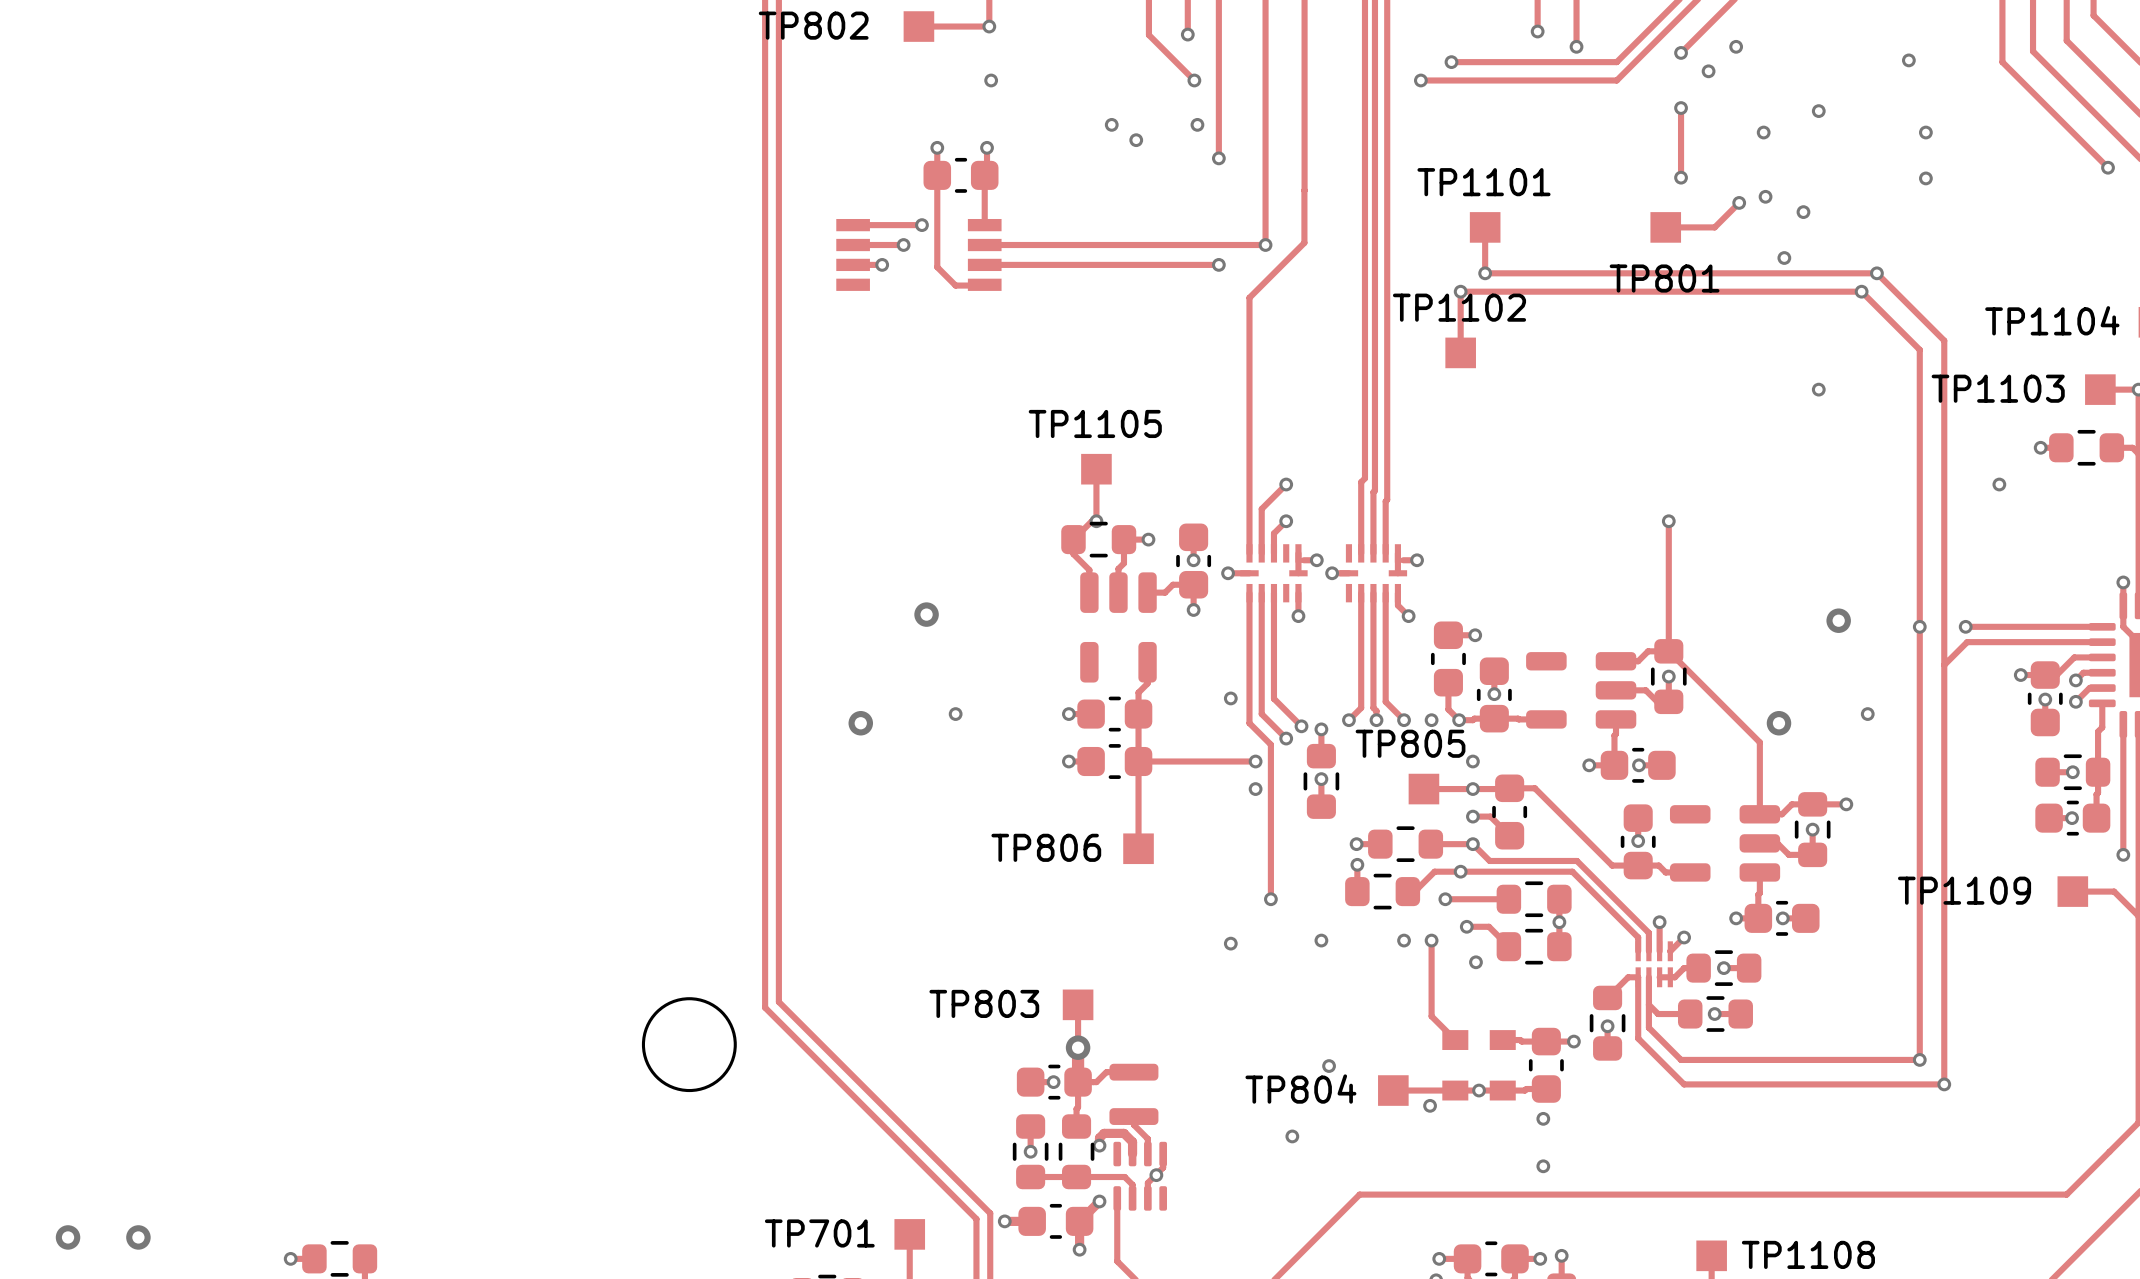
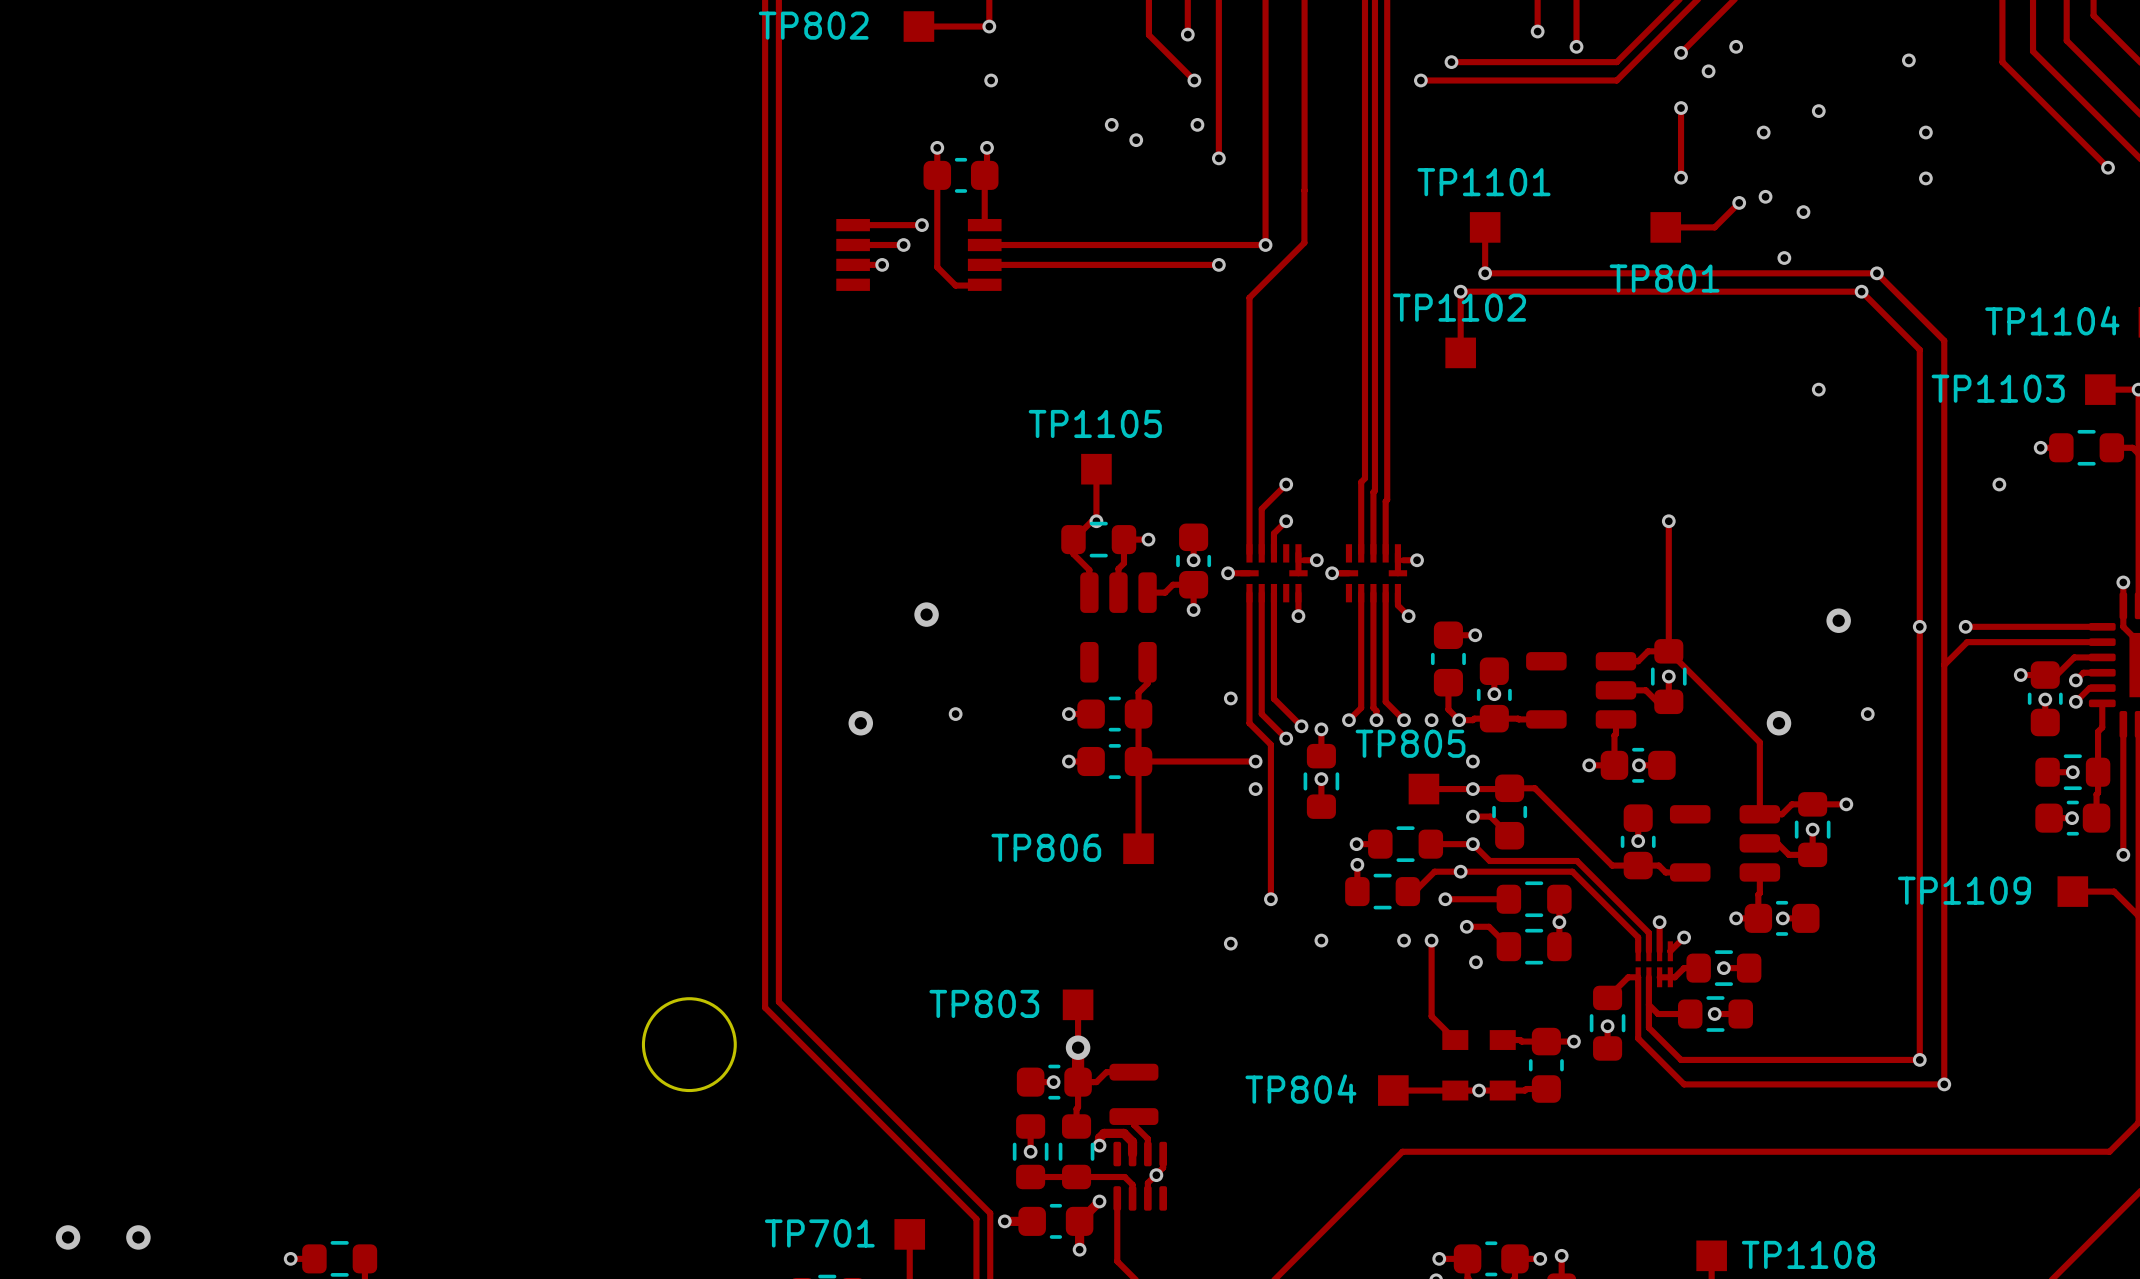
via: (1329, 1066) -> none
via: (1430, 1105) -> none
via: (1543, 1118) -> none
via: (1292, 1136) -> none
track: (2109, 1151) (2066, 1194) (1359, 1194) -> (2109, 1151) (1402, 1151) (1359, 1194)
via: (1543, 1166) -> none

